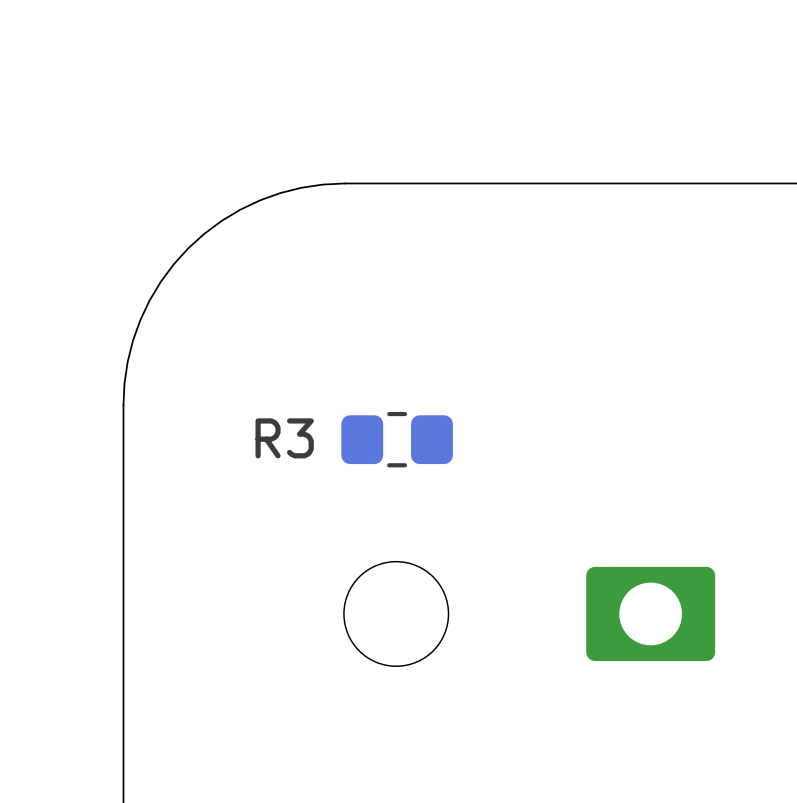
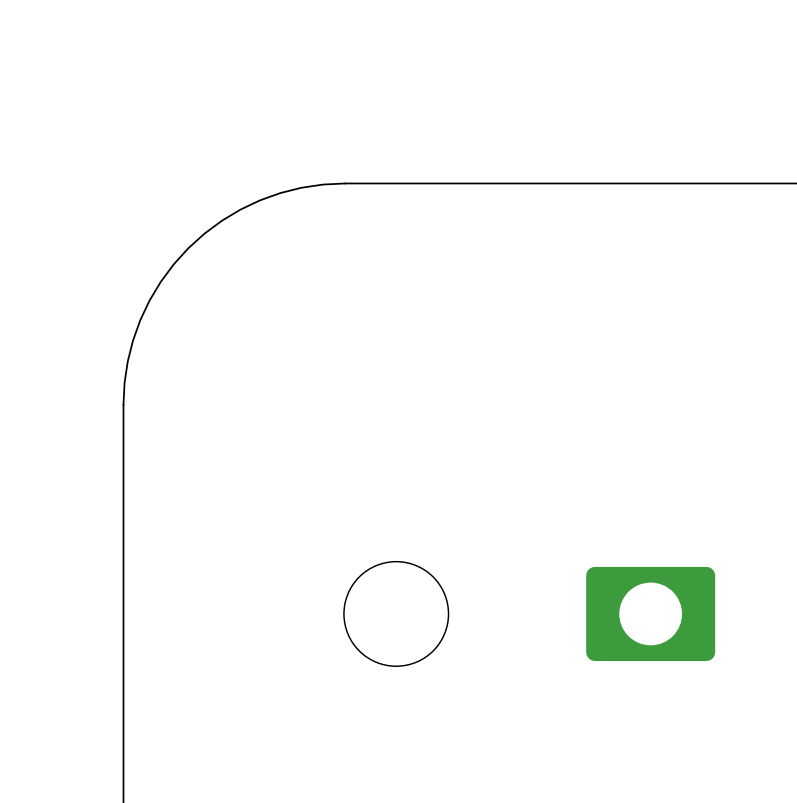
R3: (397, 439) -> none

